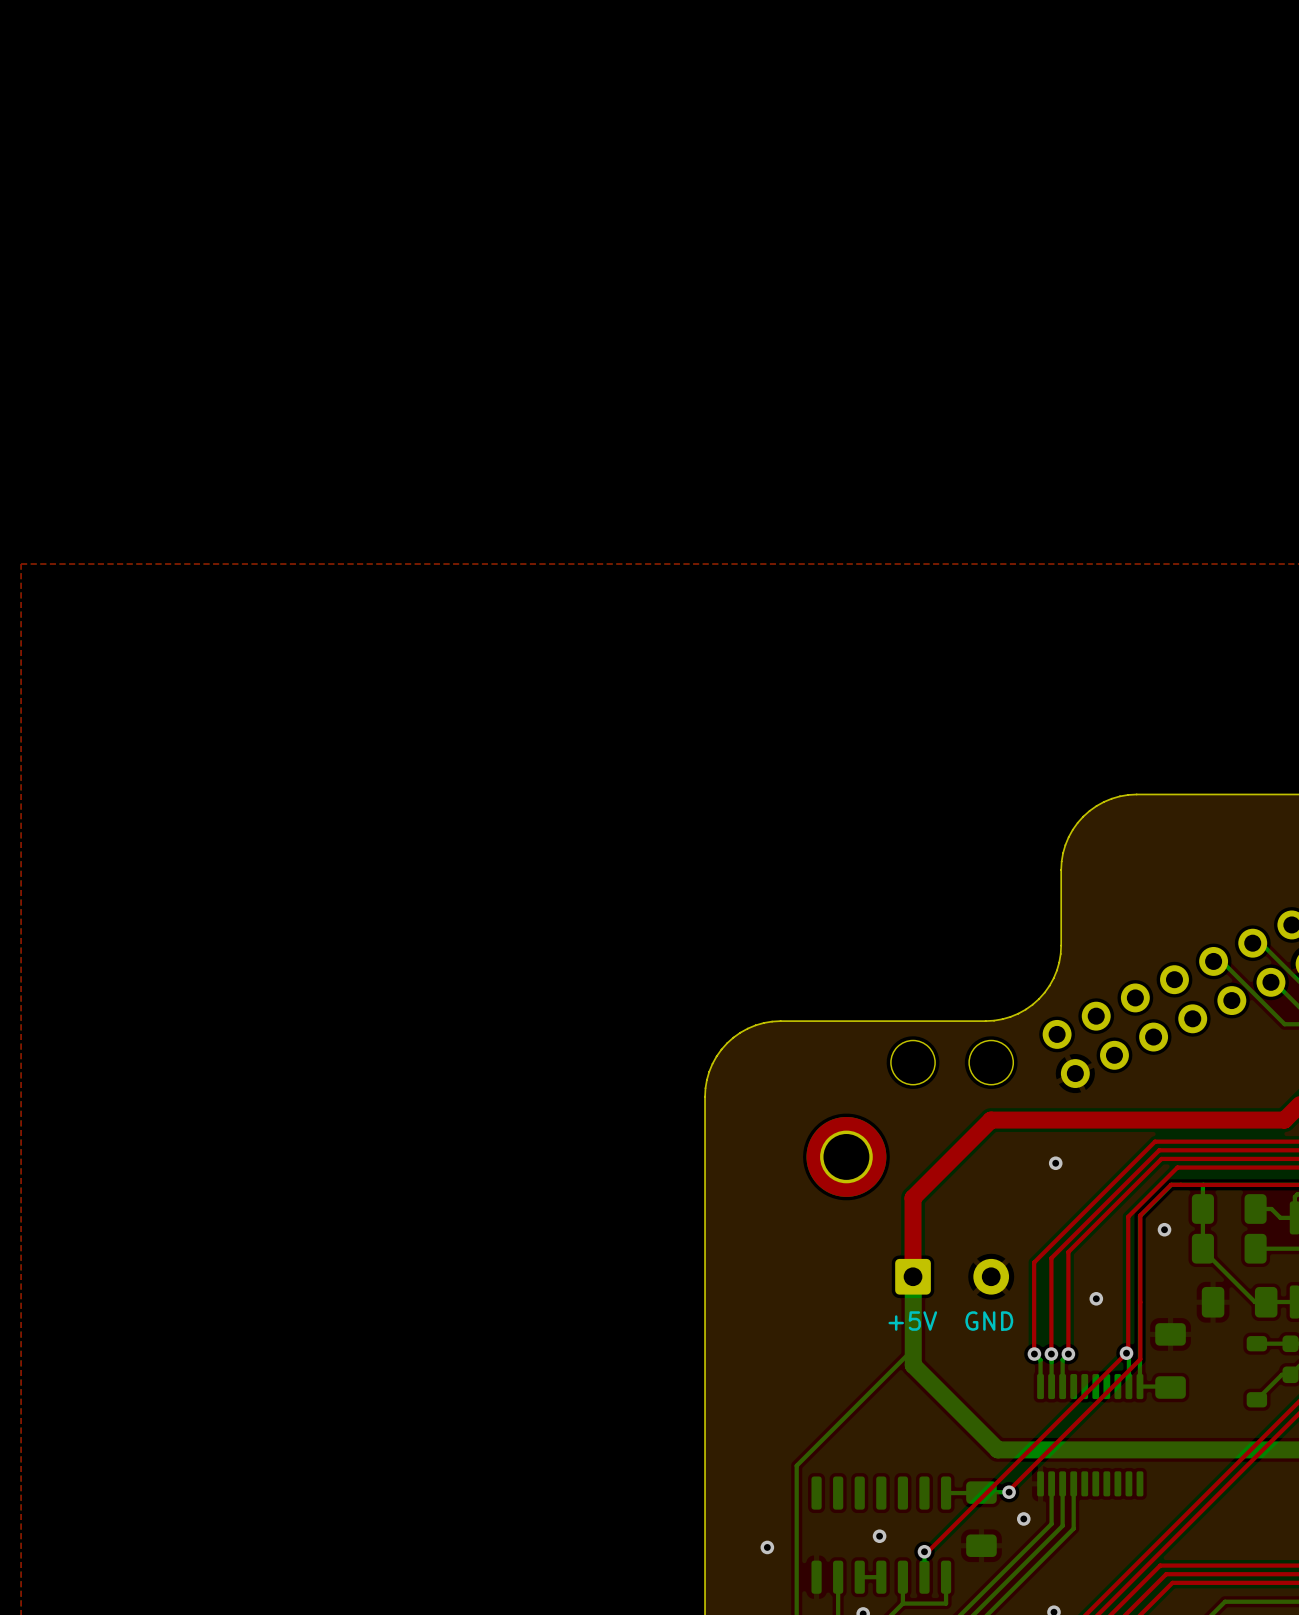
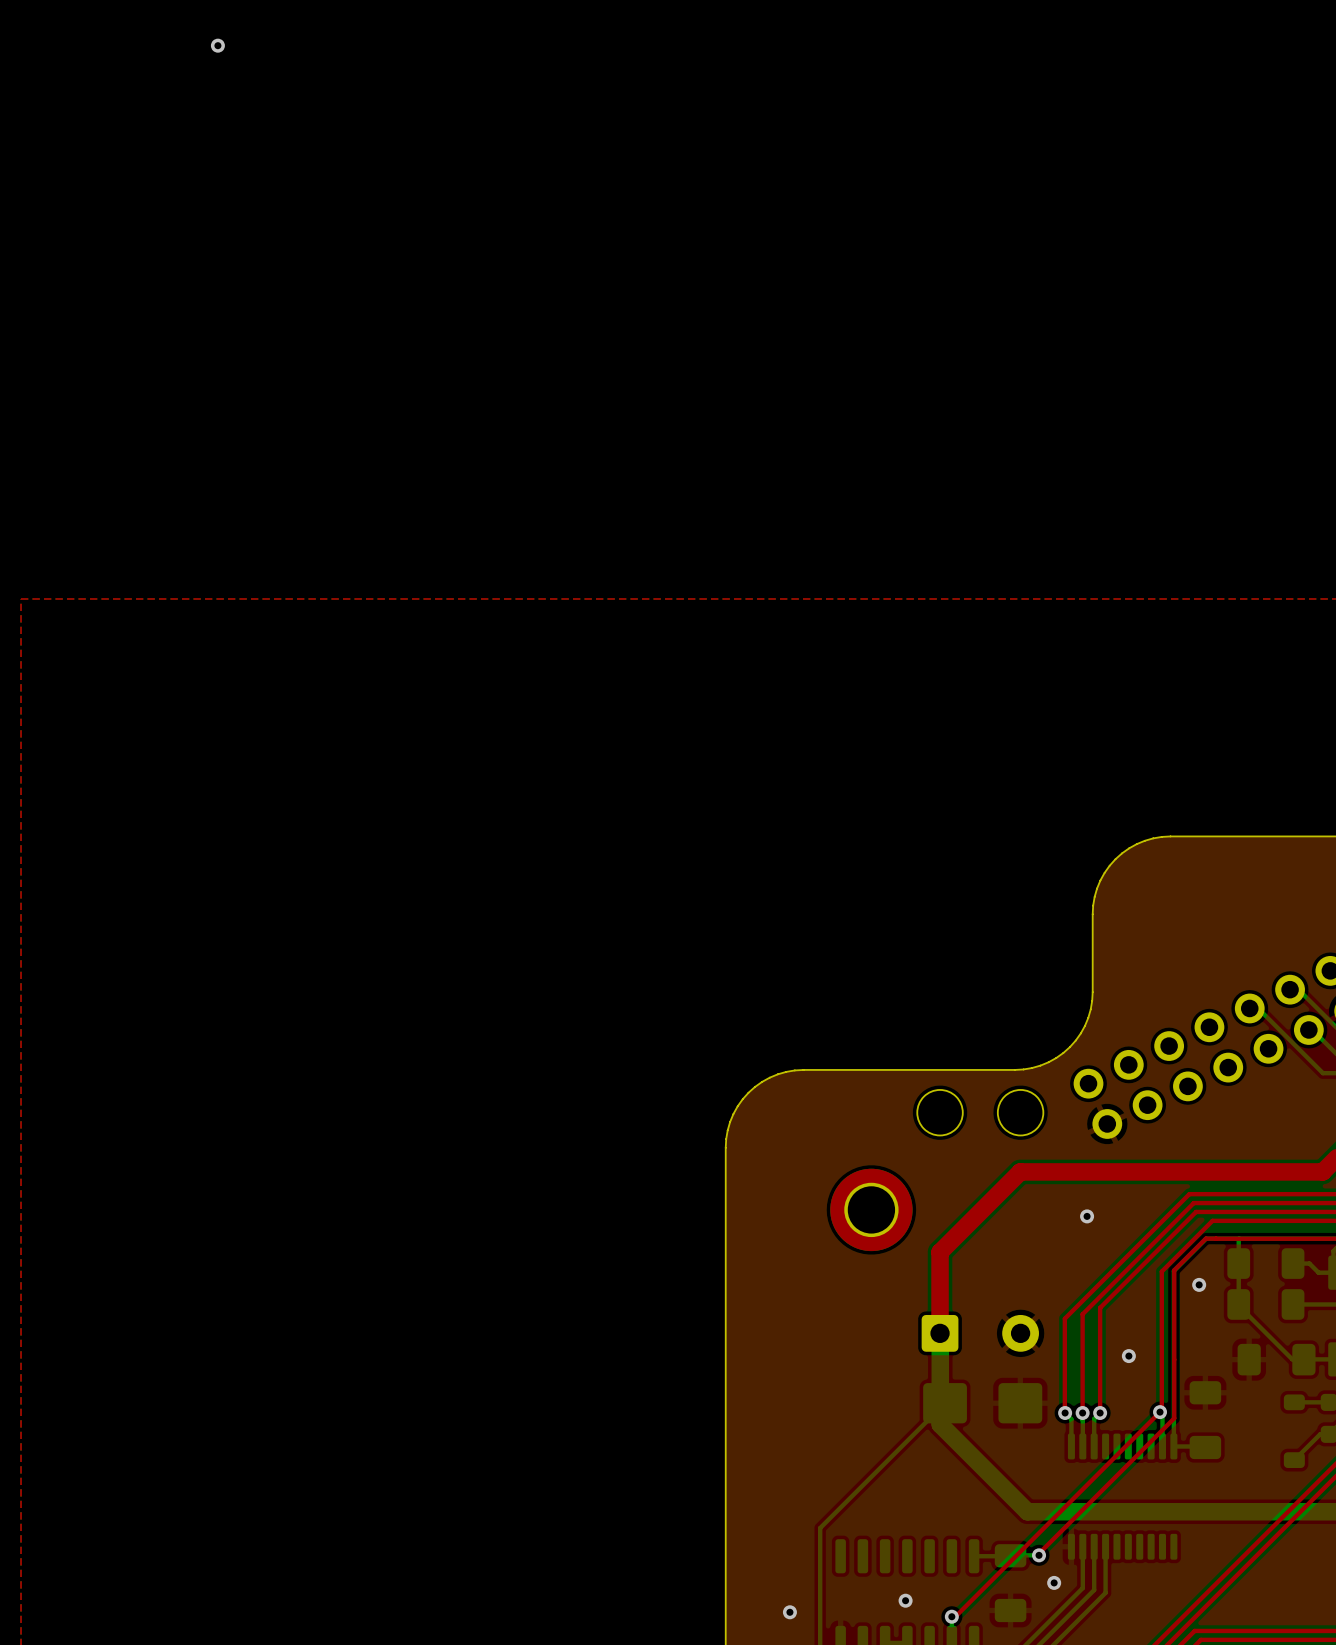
via: none -> (217, 45)
text: +5V (912, 1321) -> none
text: GND (989, 1321) -> none
part: none -> (982, 1403)

